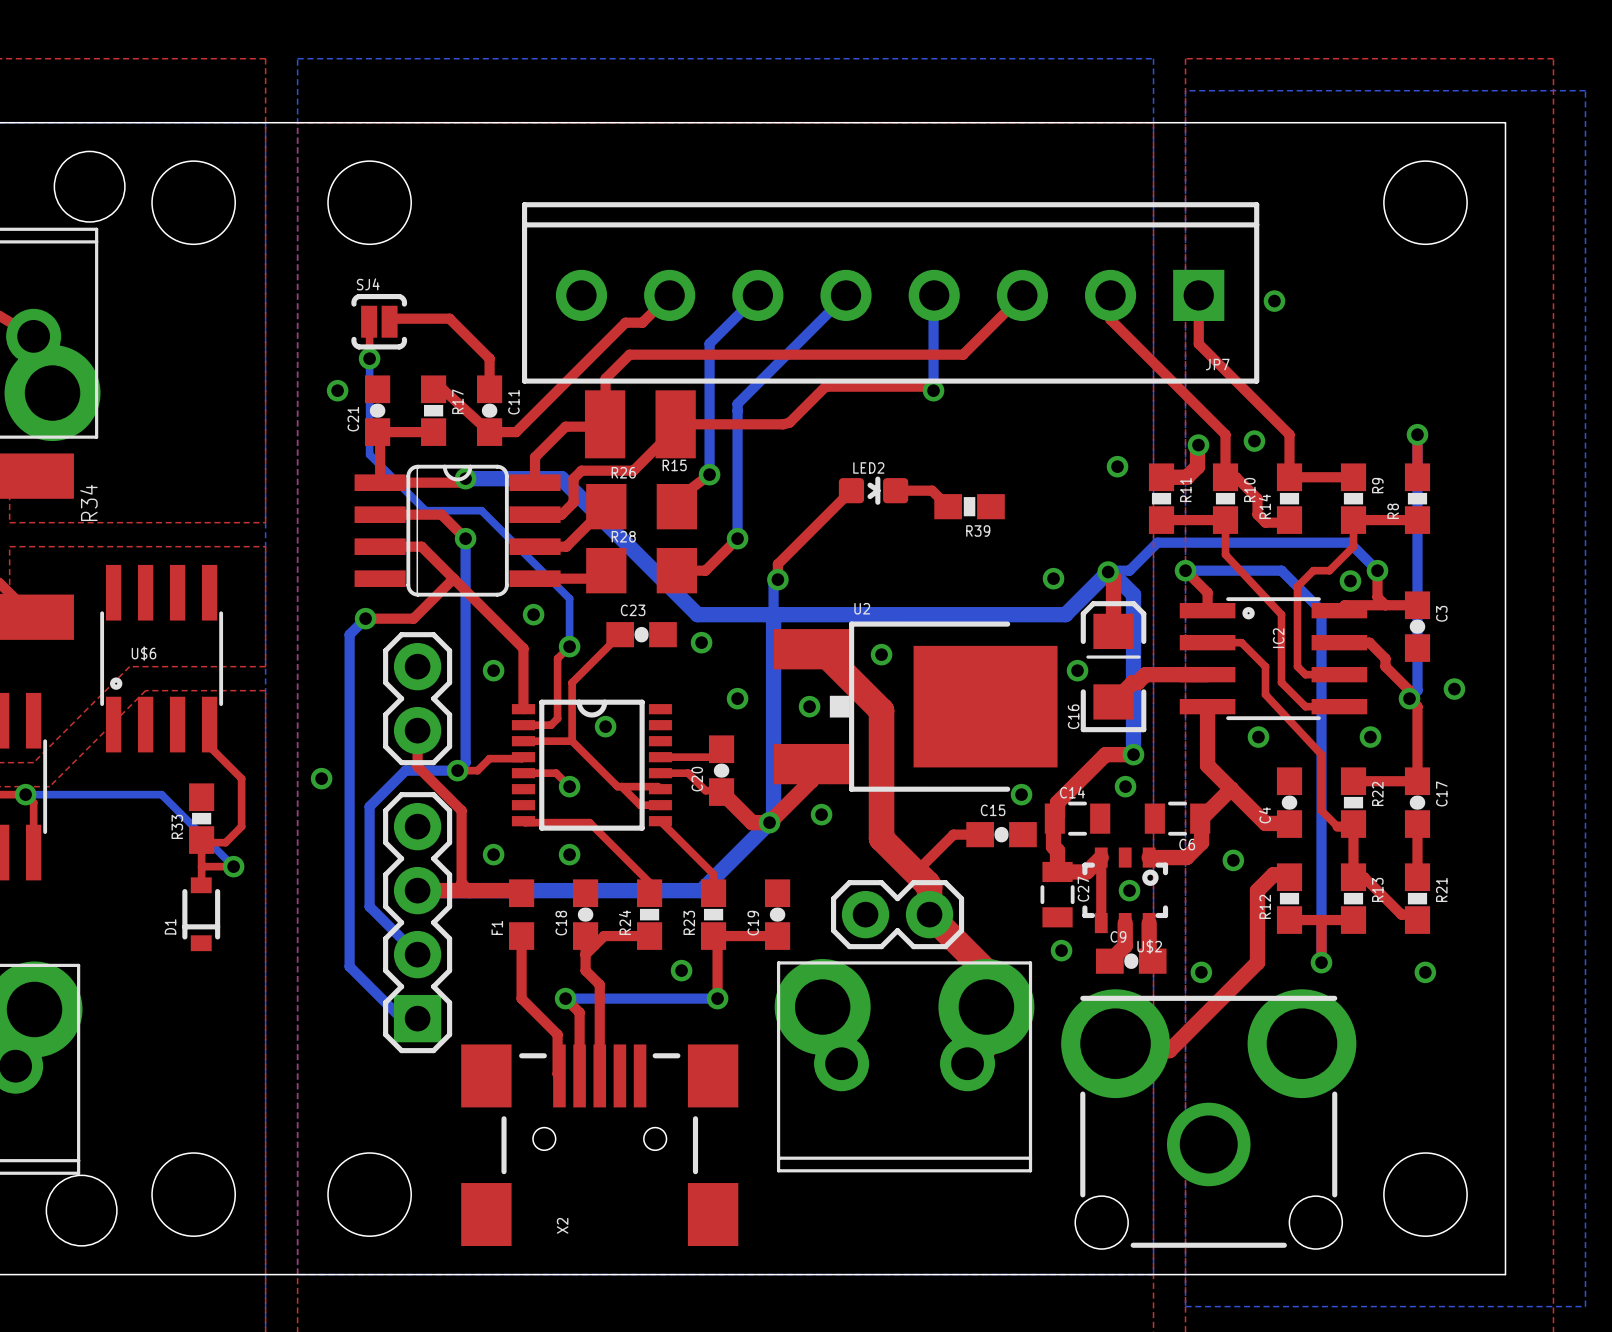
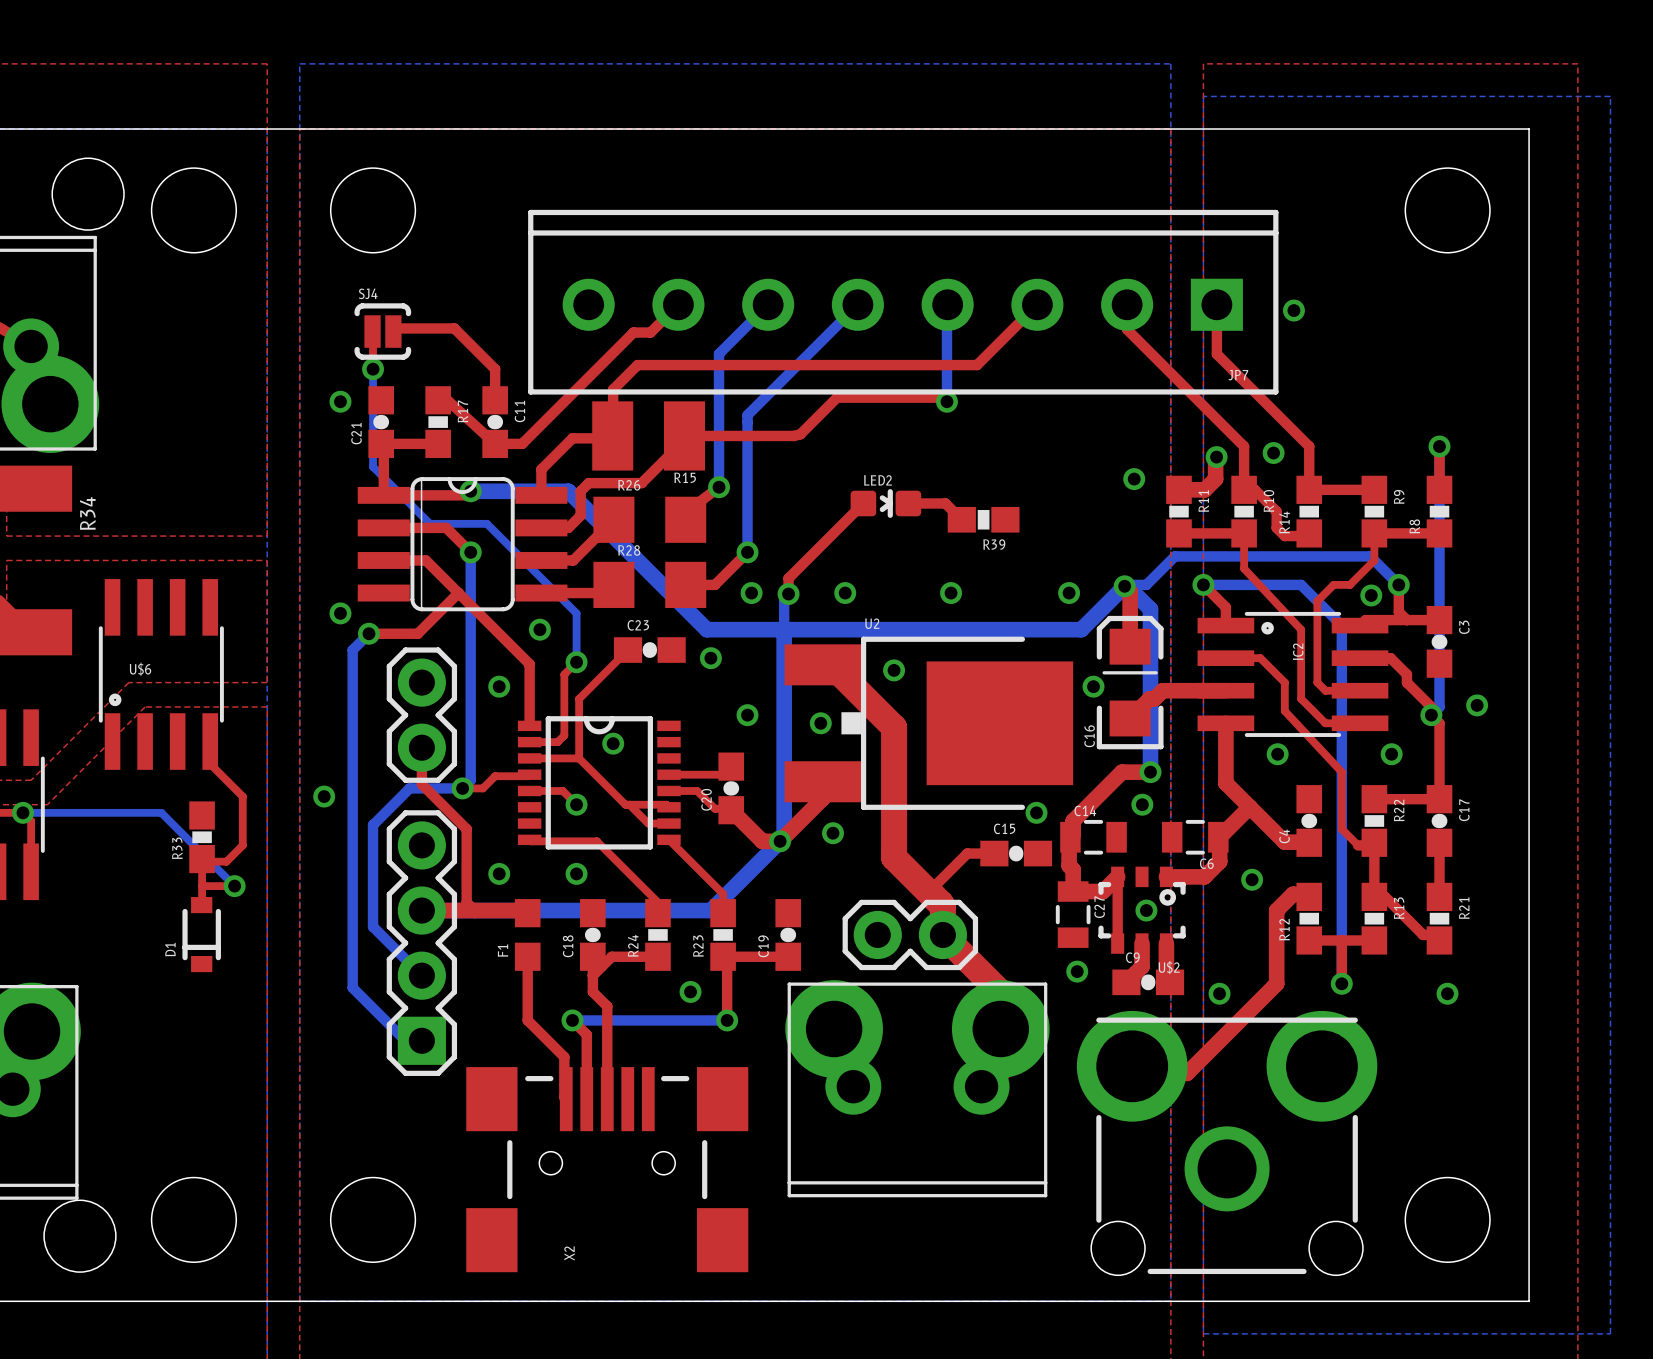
via: none -> (751, 593)
via: none -> (845, 593)
via: none -> (951, 593)
via: none -> (340, 613)

